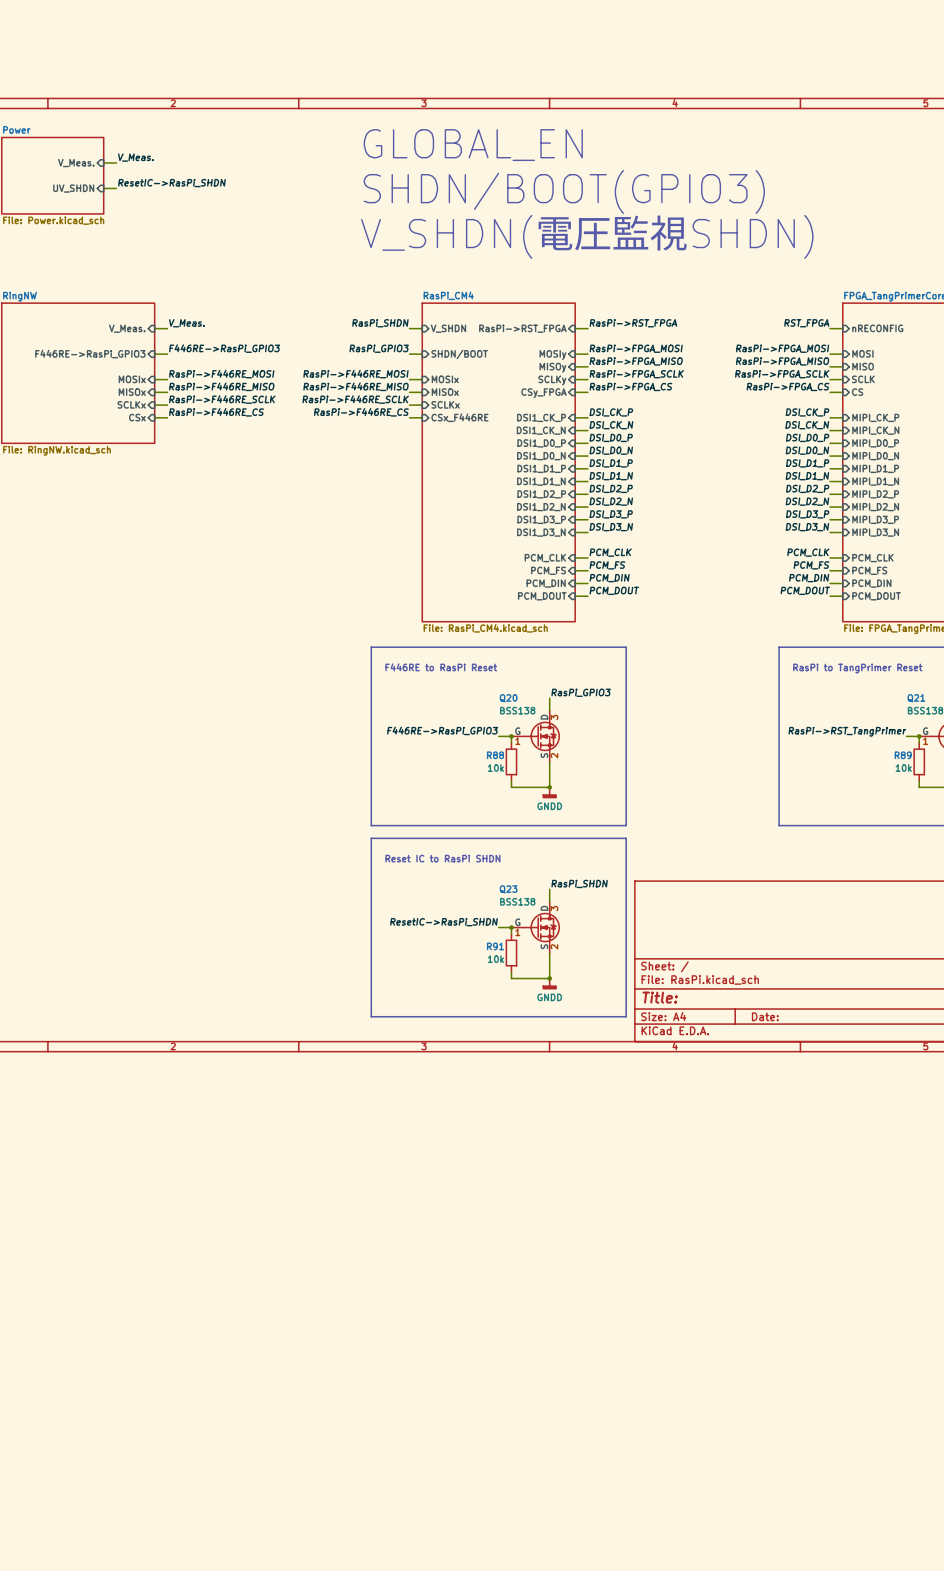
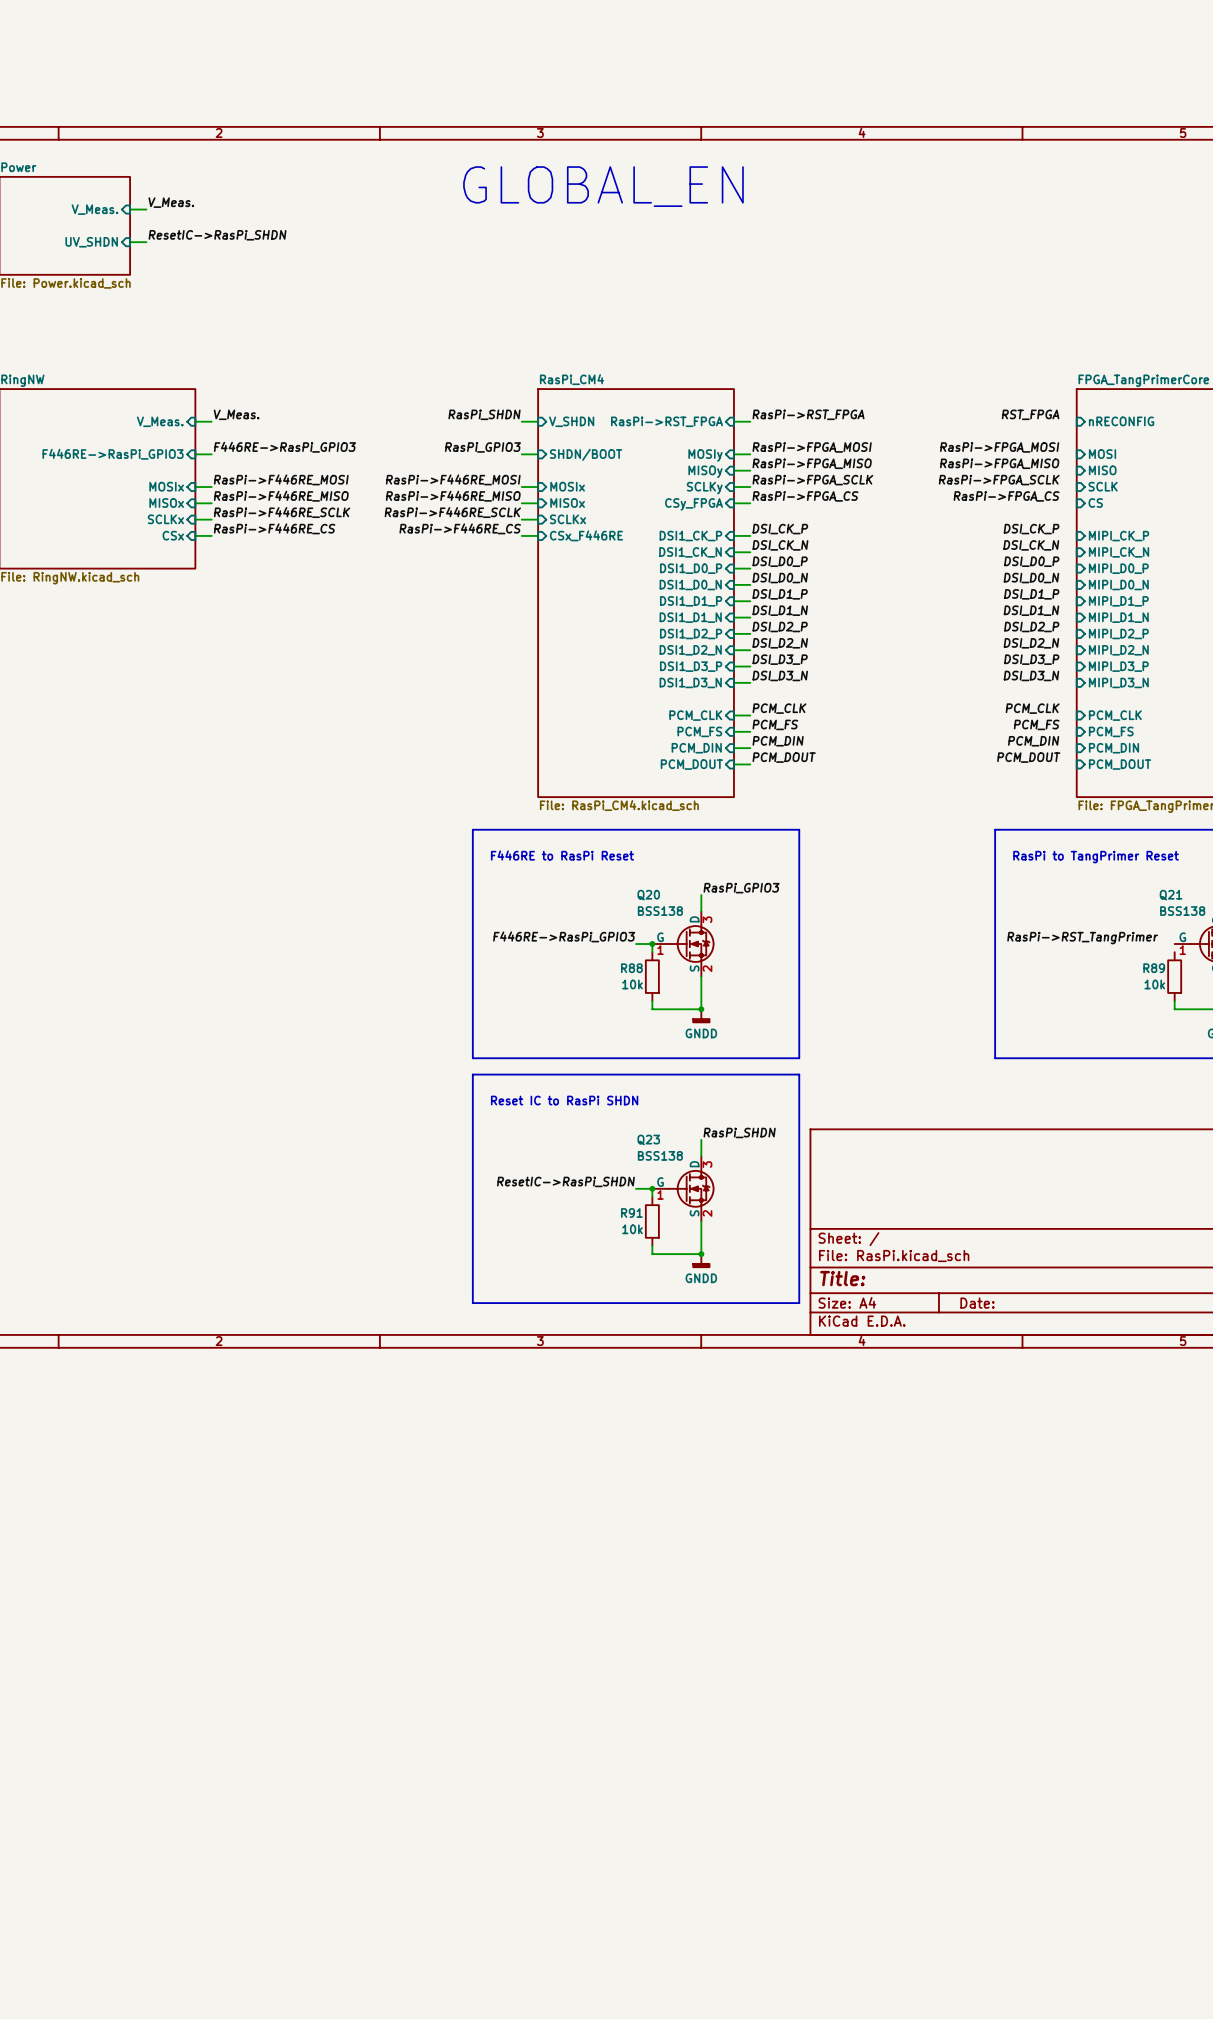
text: SHDN/BOOT(GPIO3) (564, 191) -> none
text: V_SHDN(電圧監視SHDN) (587, 236) -> none
wire: (830, 328) (842, 328) -> none
wire: (830, 354) (842, 354) -> none
wire: (830, 366) (842, 366) -> none
wire: (830, 379) (842, 379) -> none
wire: (830, 392) (842, 392) -> none
wire: (830, 417) (842, 417) -> none
wire: (830, 430) (842, 430) -> none
wire: (830, 443) (842, 443) -> none
wire: (830, 456) (842, 456) -> none
wire: (830, 468) (842, 468) -> none
wire: (830, 481) (842, 481) -> none
wire: (830, 494) (842, 494) -> none
wire: (830, 507) (842, 507) -> none
wire: (830, 519) (842, 519) -> none
wire: (830, 532) (842, 532) -> none
wire: (830, 558) (842, 558) -> none
wire: (830, 570) (842, 570) -> none
wire: (830, 583) (842, 583) -> none
wire: (830, 596) (842, 596) -> none
wire: (906, 736) (919, 736) (919, 742) -> none
junction: (919, 736) -> none

